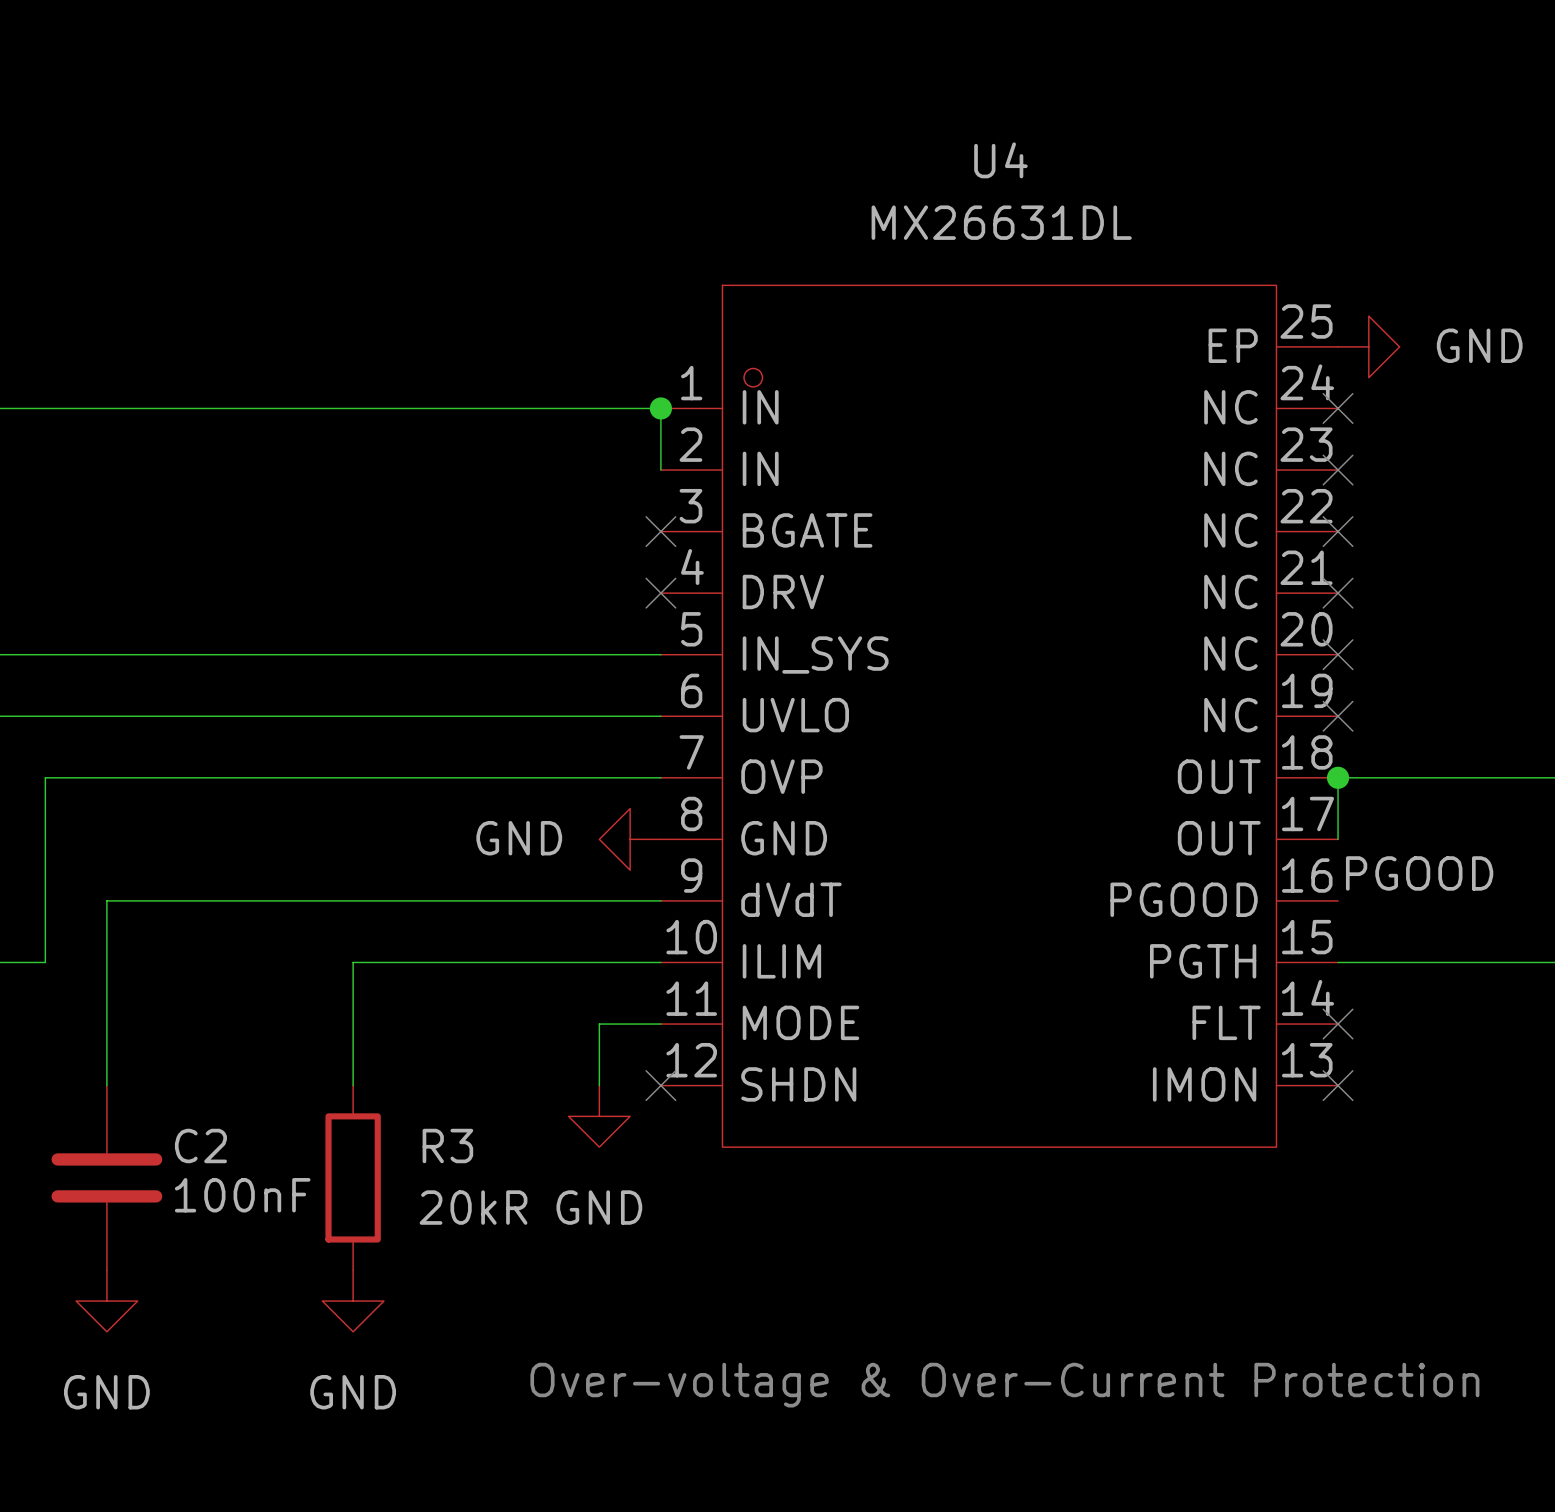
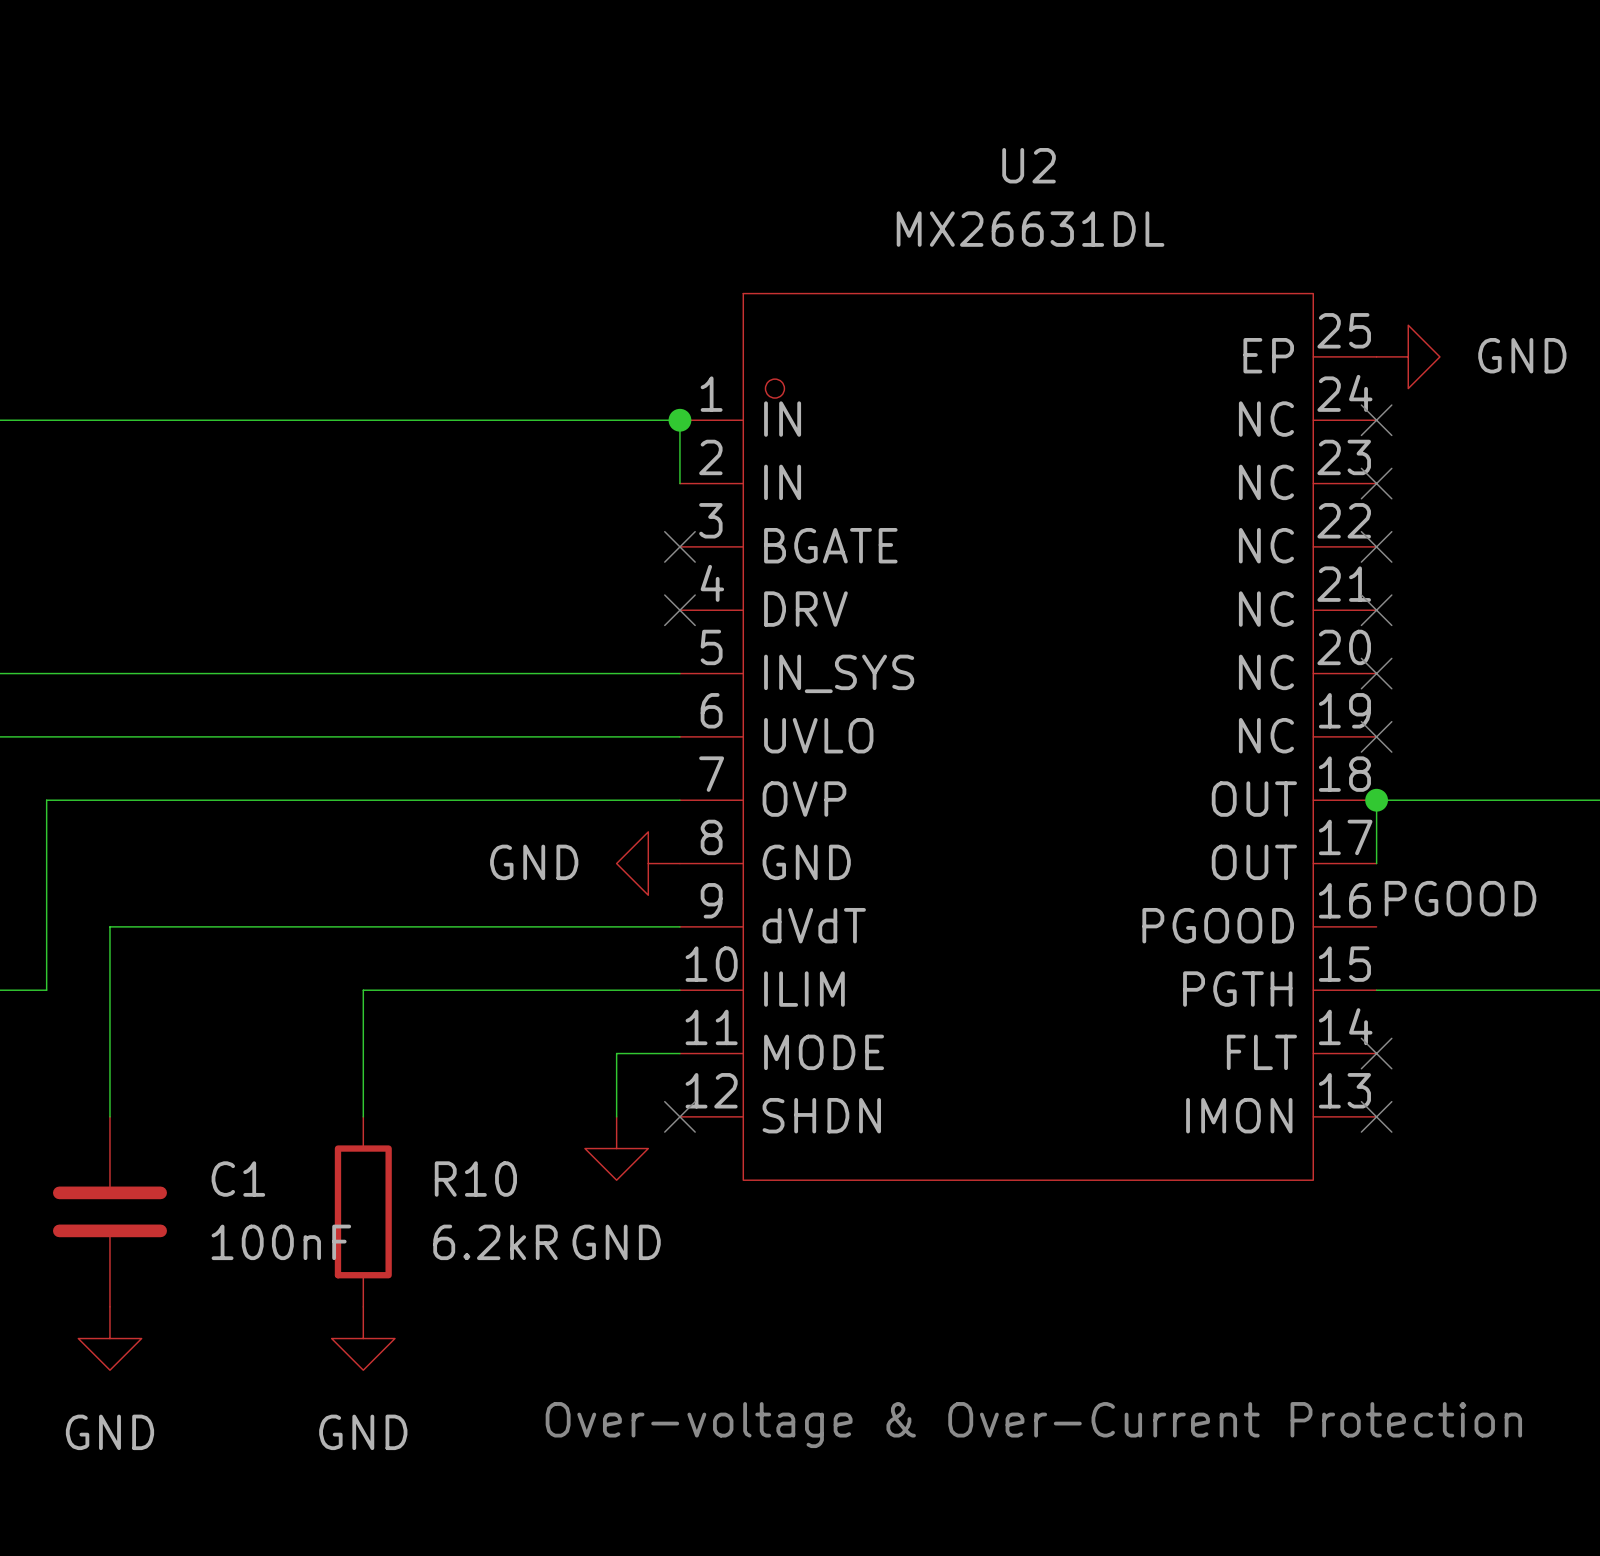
U4 name: U4 (1000, 160) -> U2 (1029, 165)
C2 name: C2 (200, 1146) -> C1 (238, 1179)
R3 name: R3 (447, 1146) -> R10 (475, 1179)
C2 value position: 100nF (242, 1195) -> 100nF (281, 1242)
R3 value: 20kR (473, 1207) -> 6.2kR (495, 1242)

